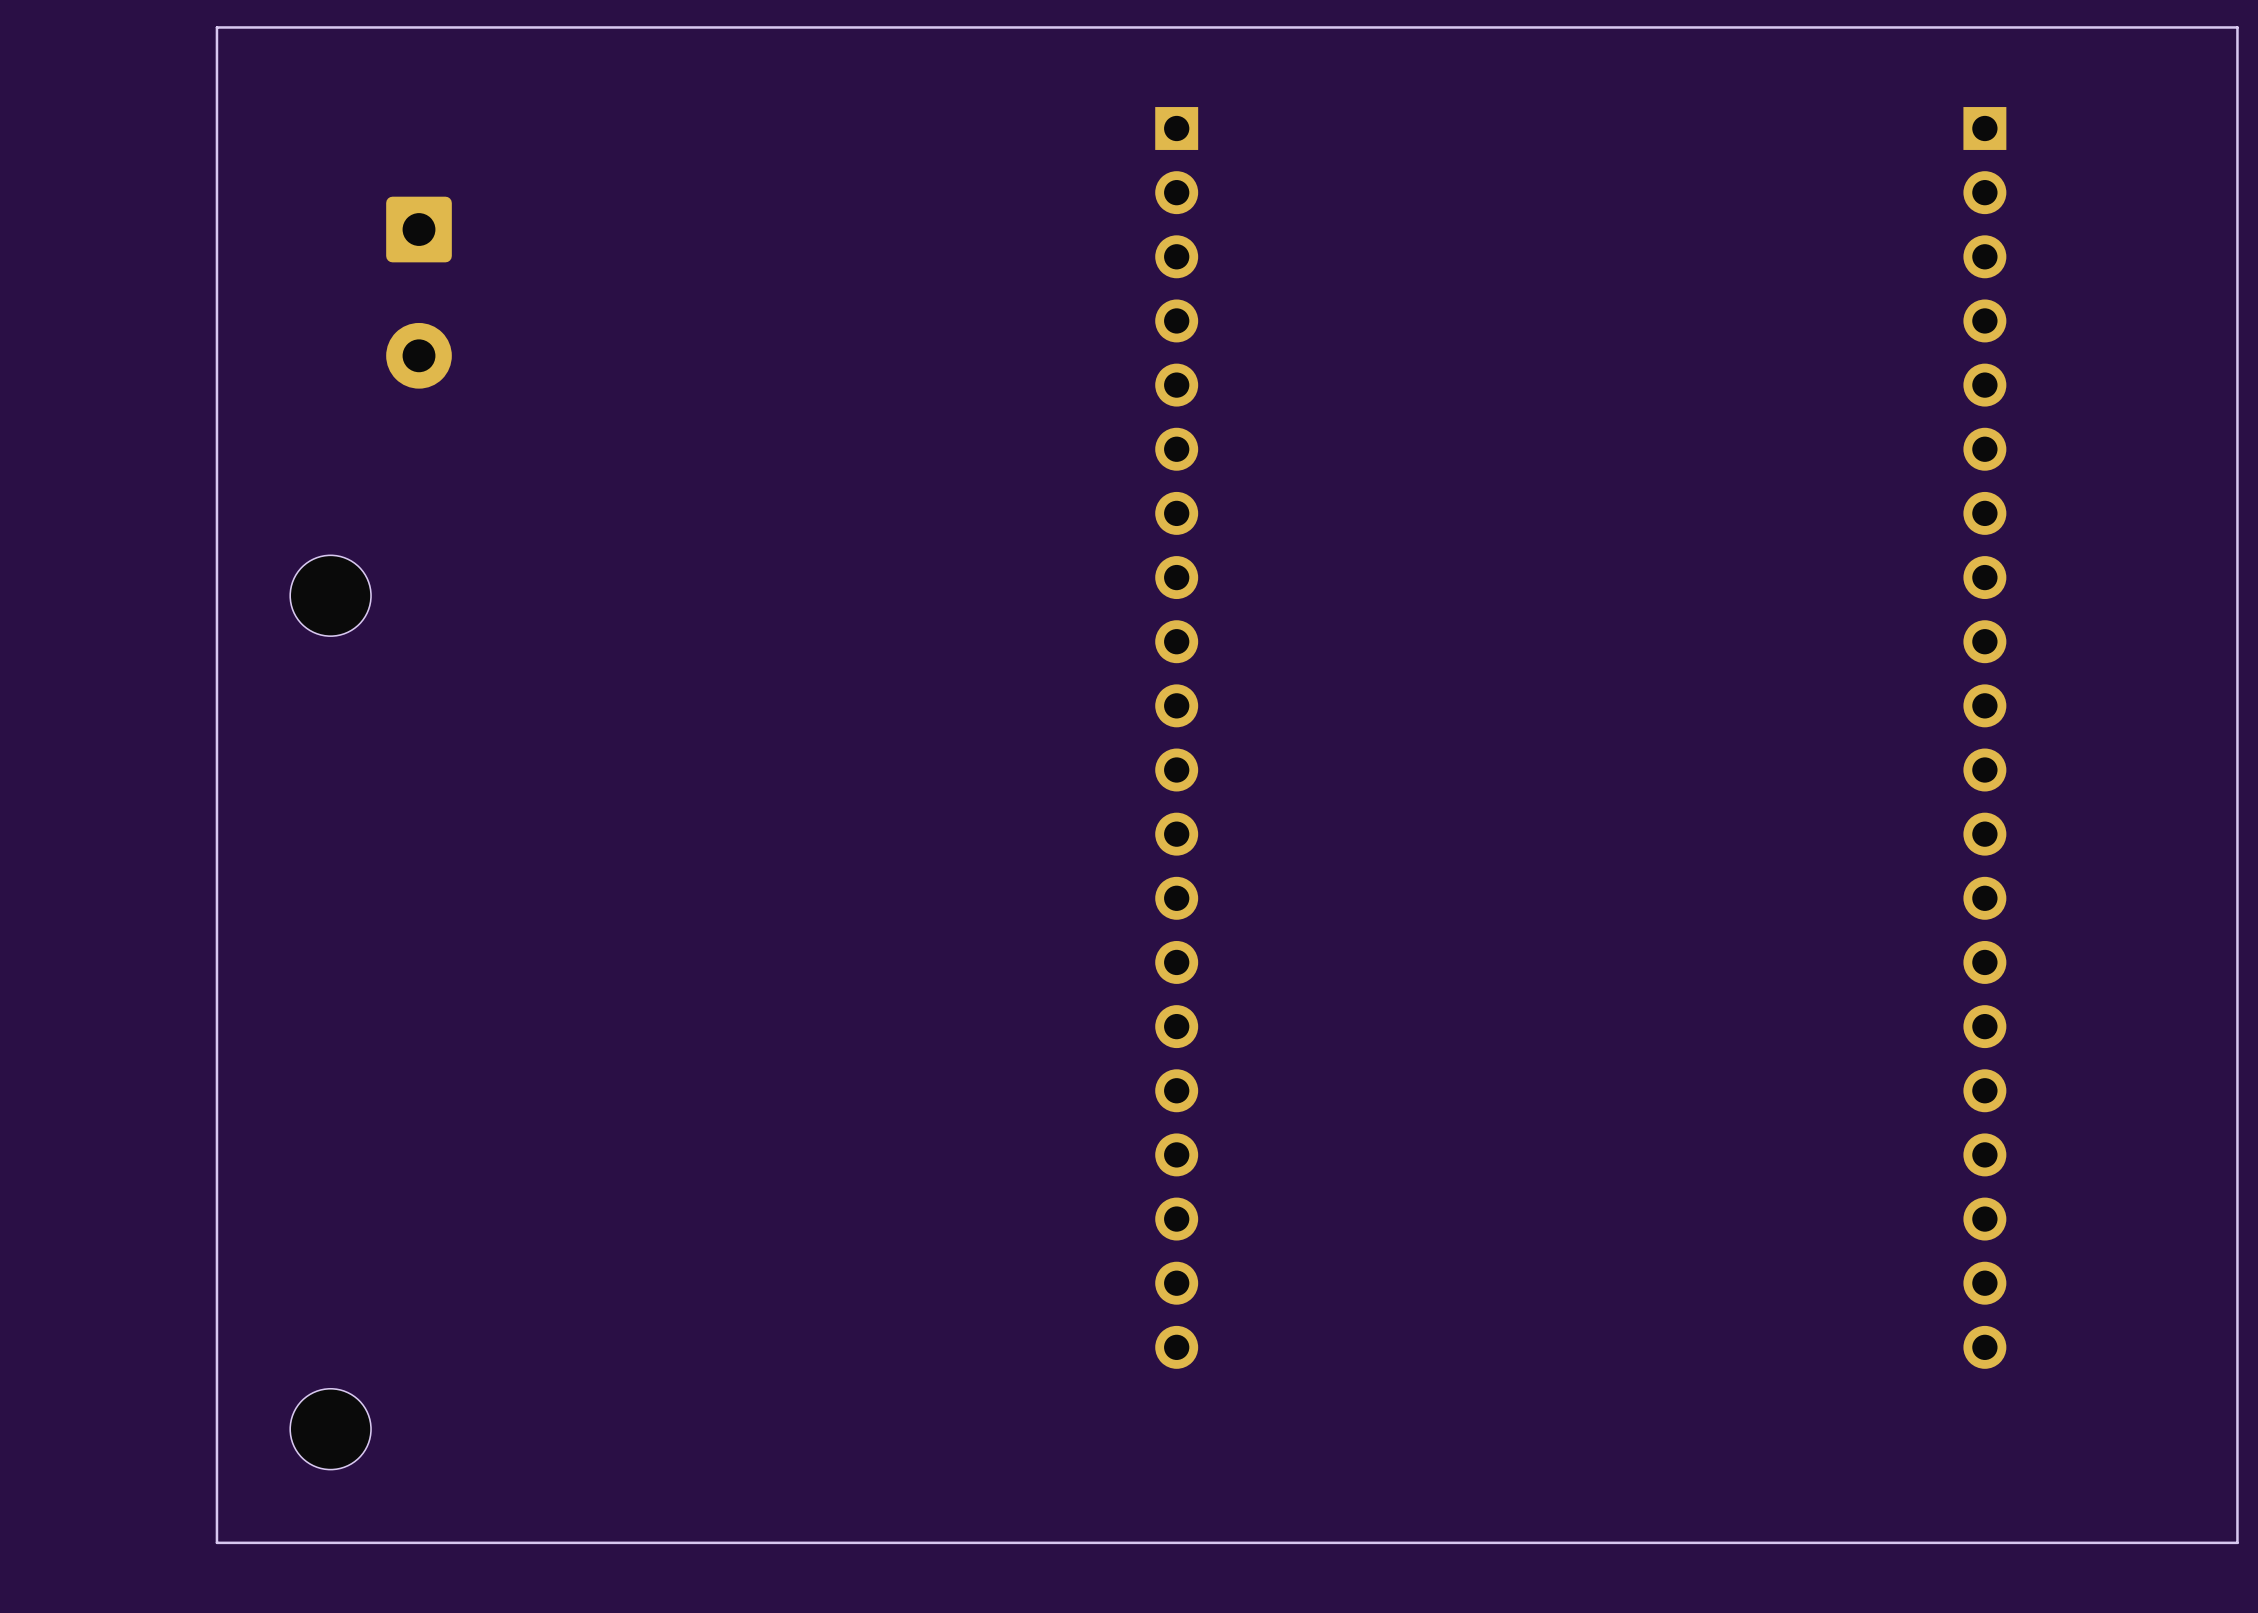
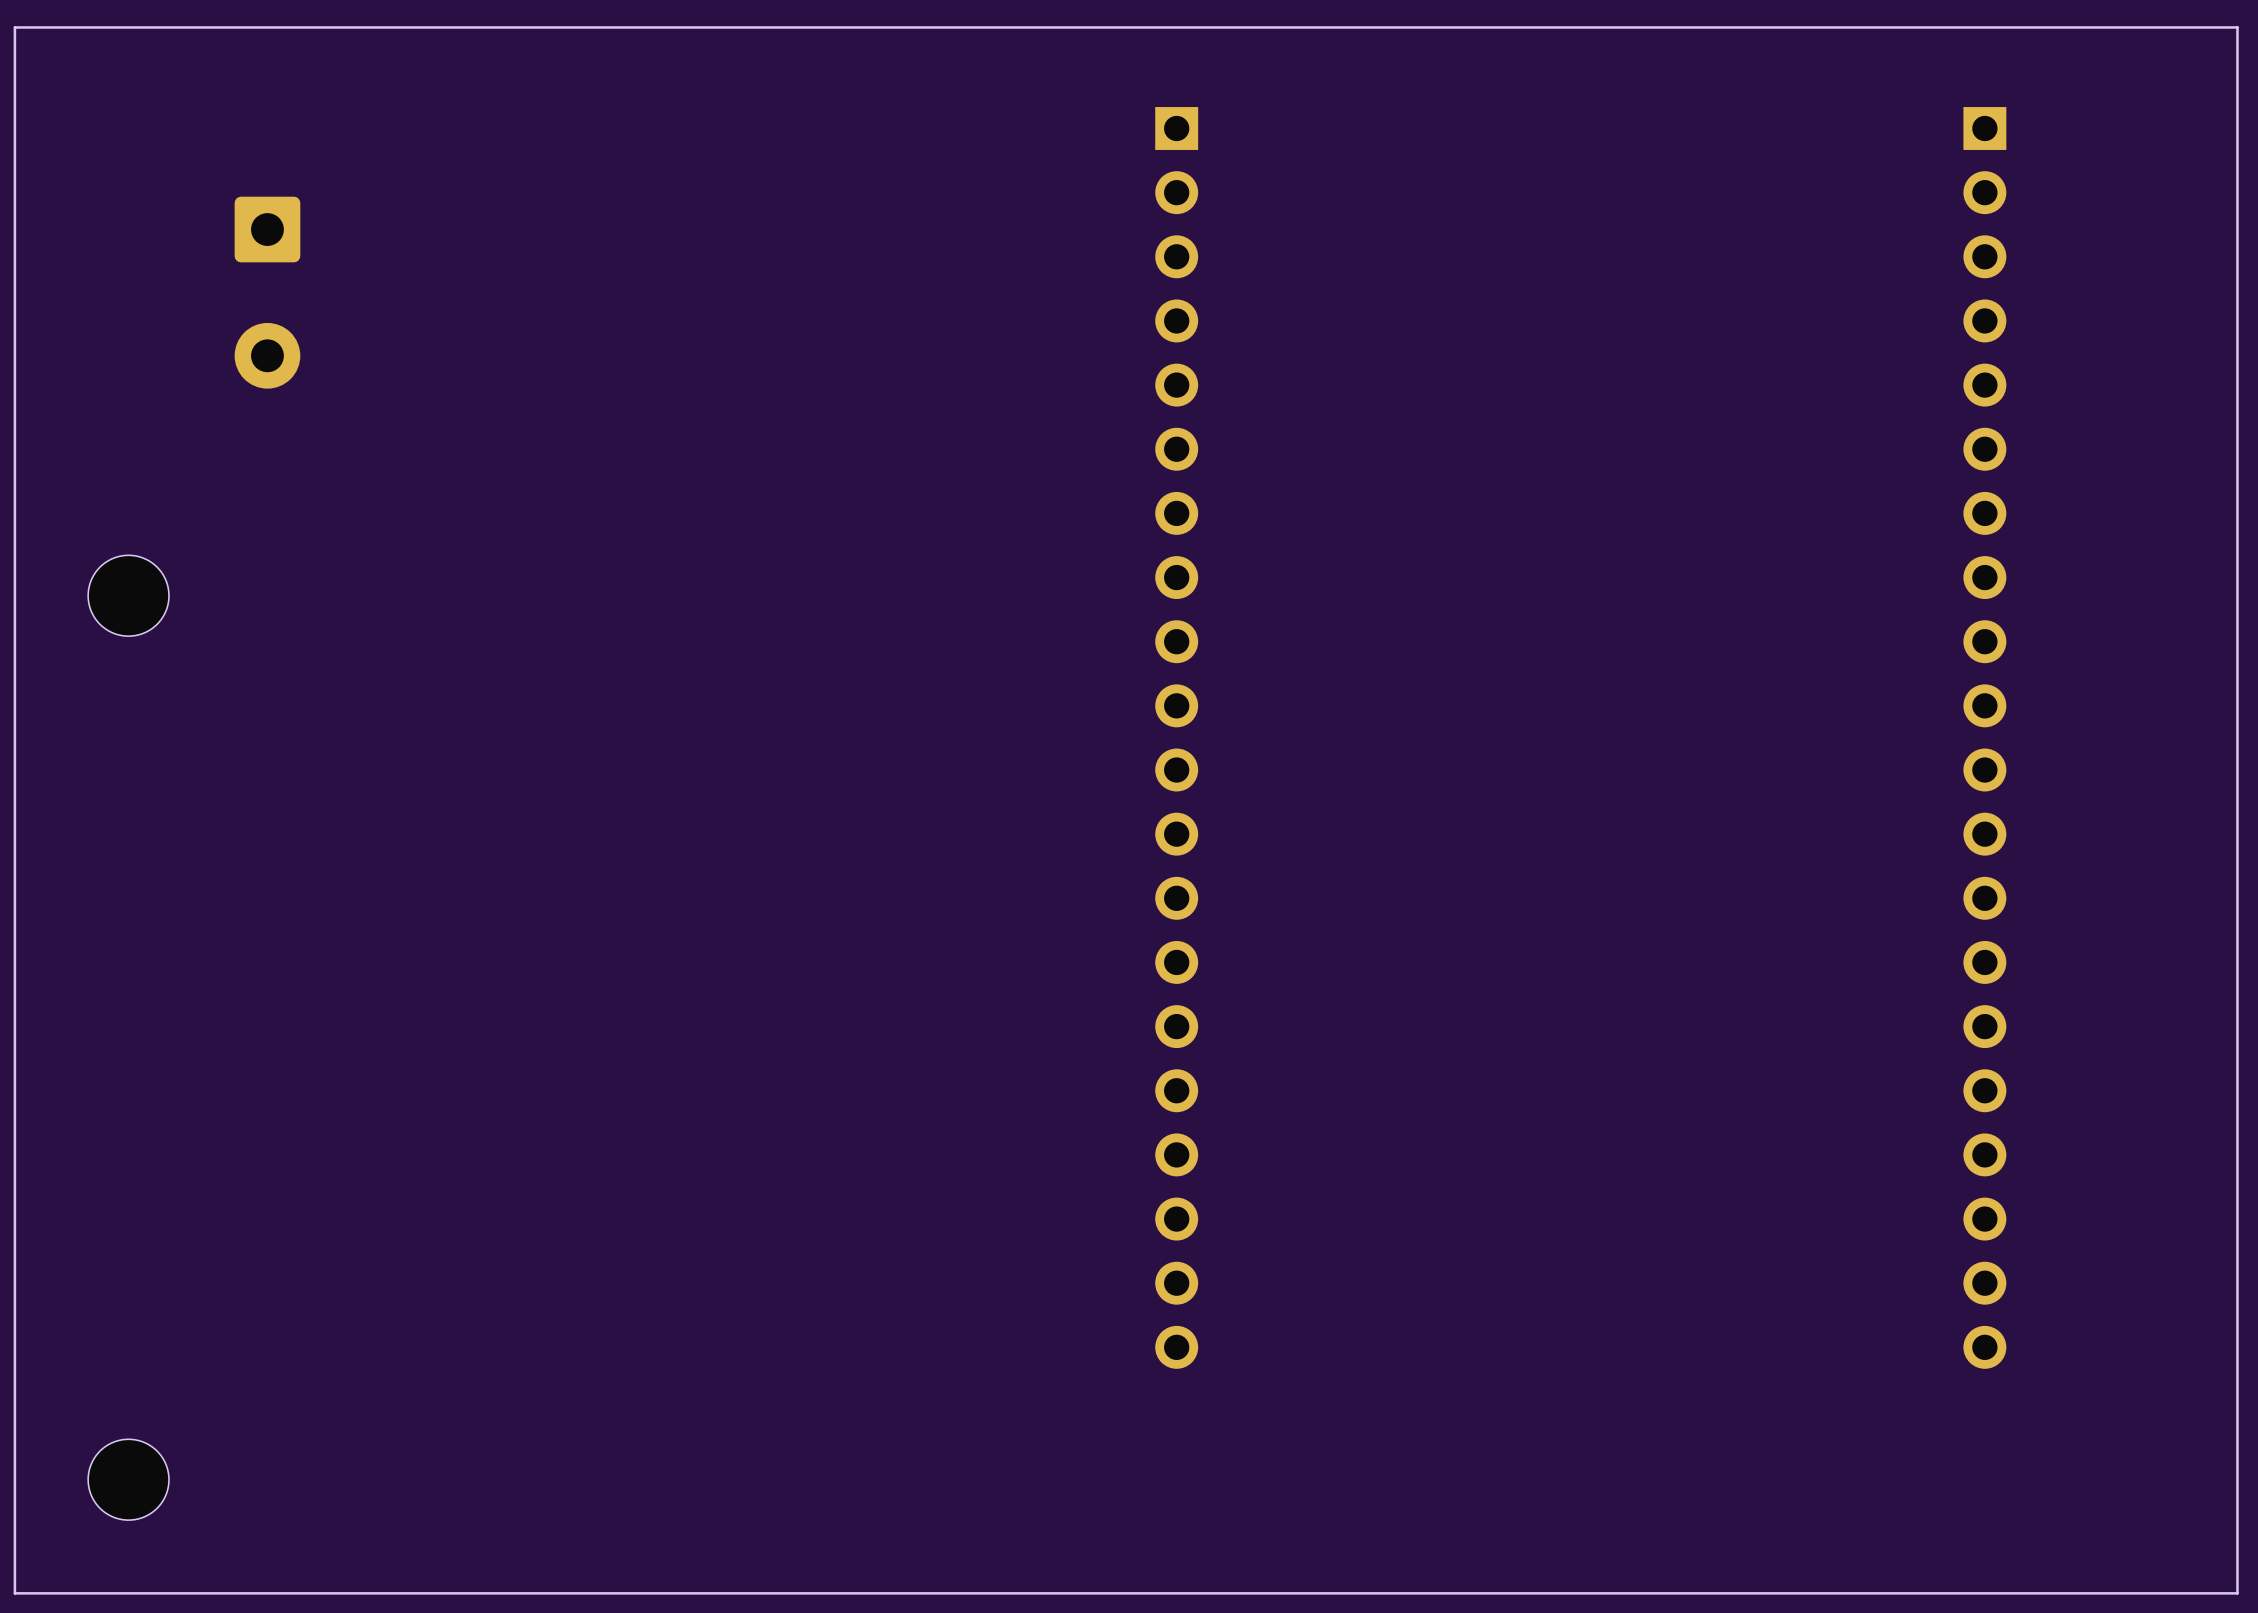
board edge: (216, 27) (216, 1542) (2237, 1542) -> (216, 27) (14, 27) (14, 1593) (2237, 1593) (2237, 1542)
part position: (419, 292) -> (267, 292)
part position: (330, 595) -> (128, 595)
part position: (330, 1429) -> (128, 1479)

